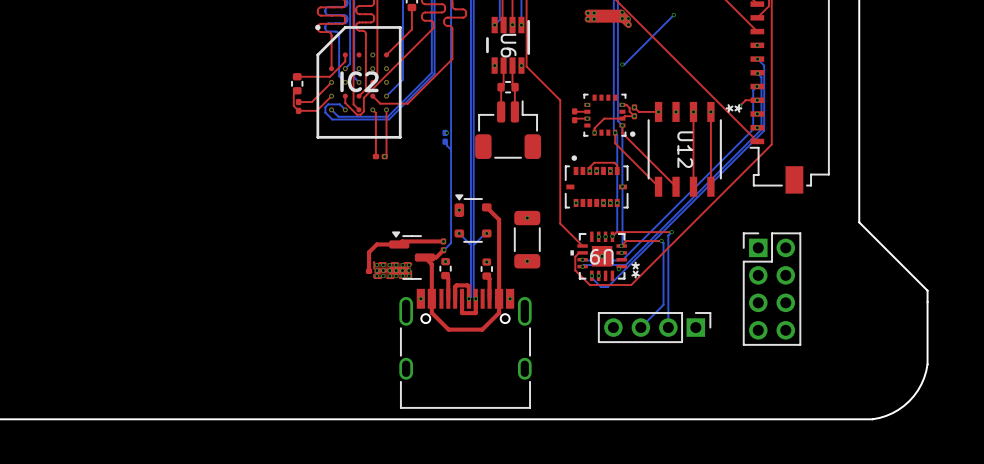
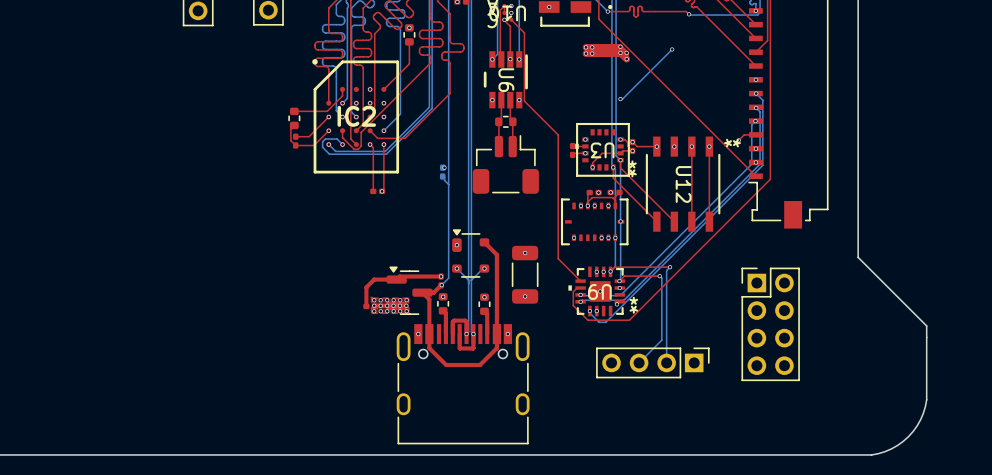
via: (757, 100) -> none
U3: none -> (602, 149)
part: (609, 115) -> none
part footprint: [564, 155, 629, 209] -> [560, 198, 629, 246]
top track: none -> (589, 192) (587, 194) (587, 202)
part: none -> (594, 192)
via: none -> (598, 192)
via: none -> (610, 192)
part: none -> (615, 192)
top track: none -> (619, 192) (615, 196) (615, 200)
via: none -> (580, 205)

